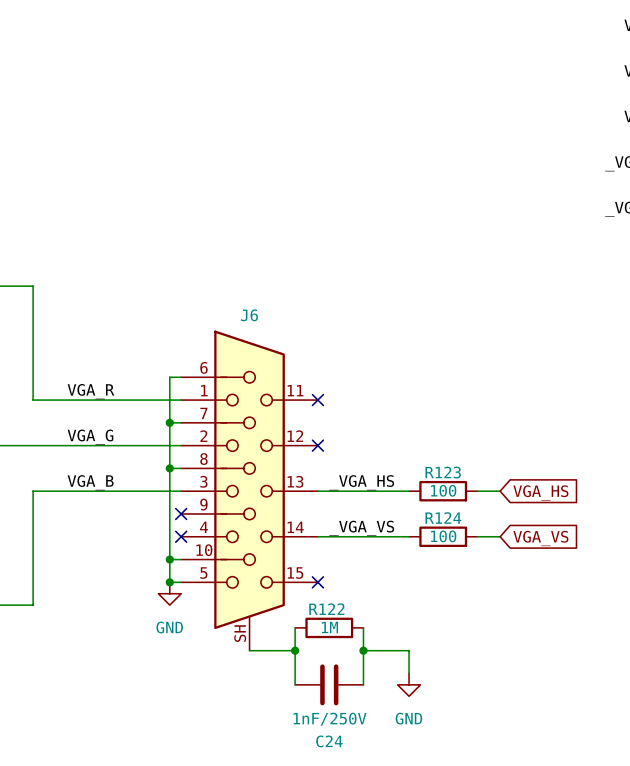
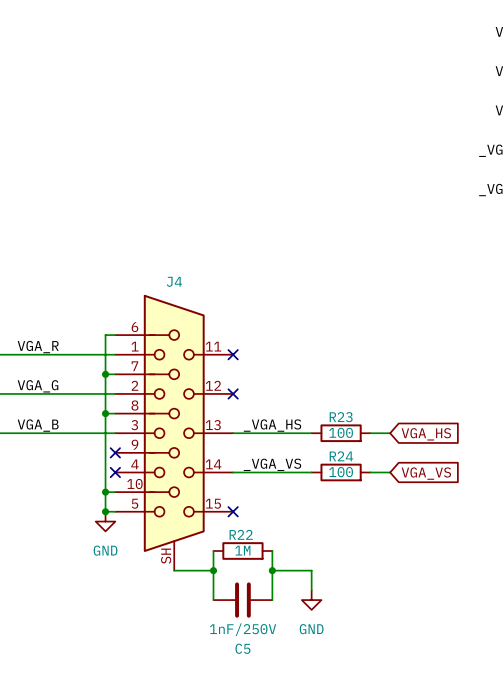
J6 name: J6 (249, 315) -> J4 (174, 281)
R123 name: R123 (443, 472) -> R23 (341, 417)
R124 name: R124 (443, 518) -> R24 (341, 456)
R122 name: R122 (326, 609) -> R22 (241, 534)
C24 name: C24 (329, 741) -> C5 (242, 648)

